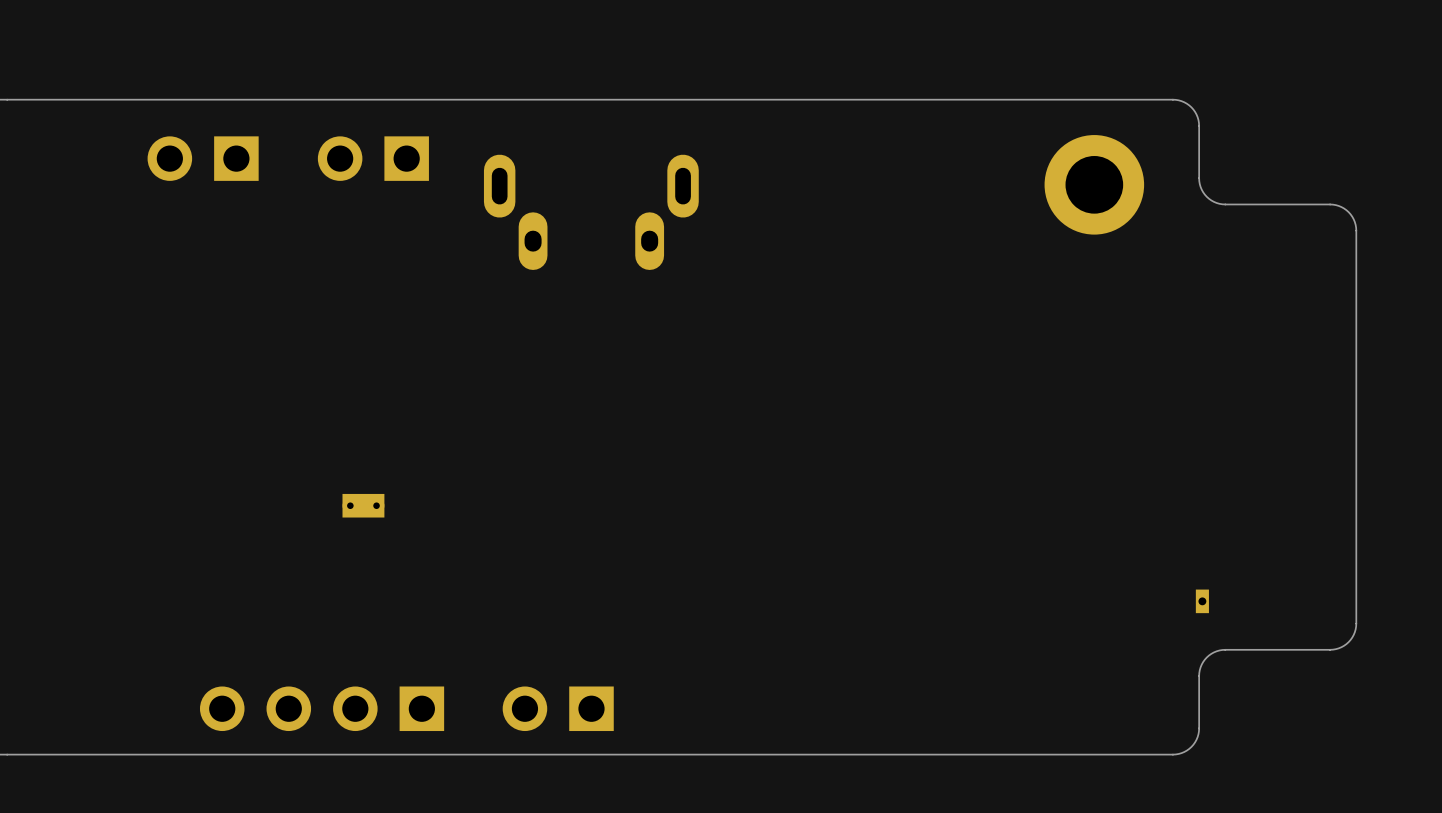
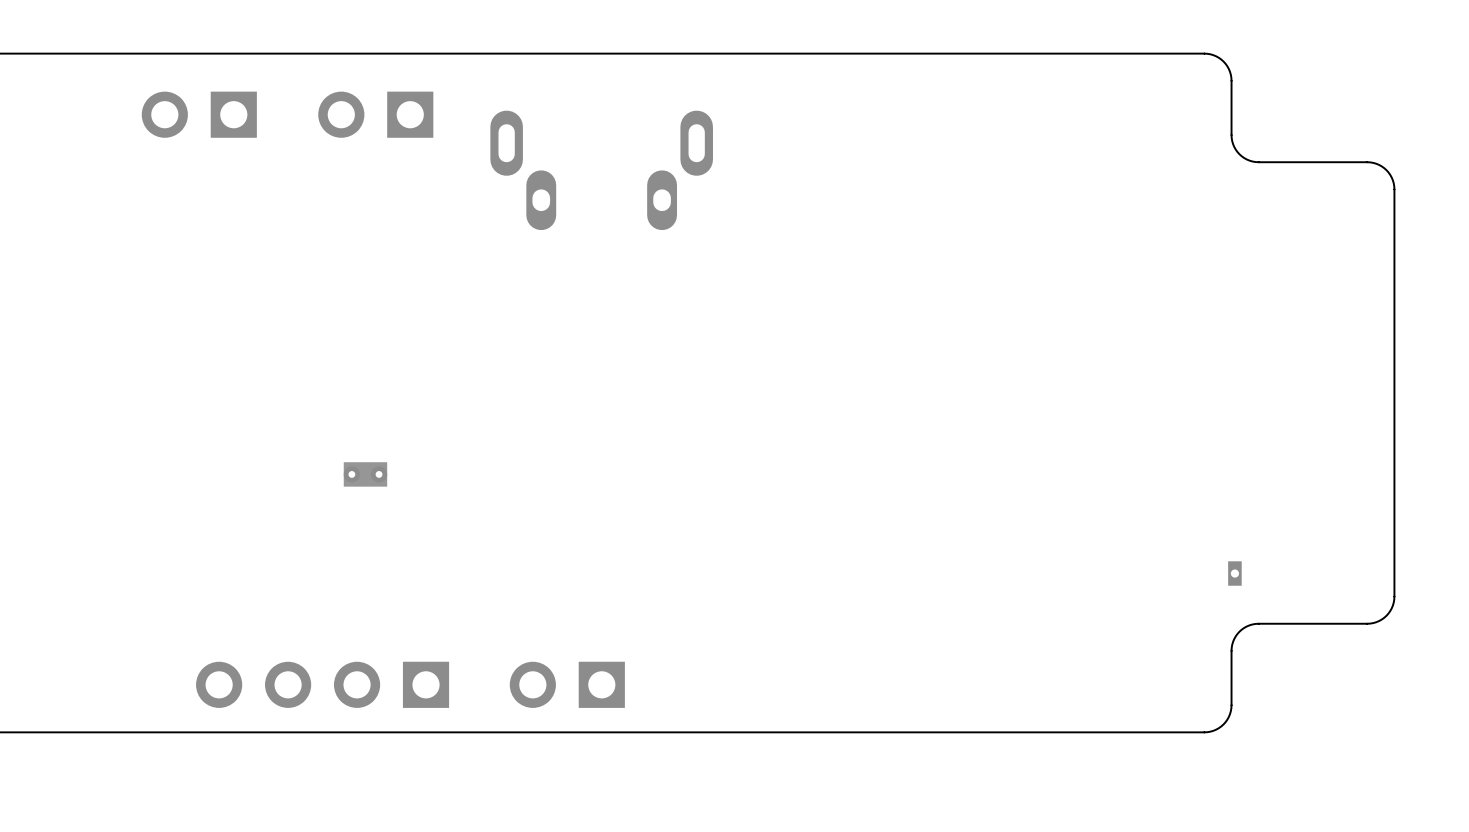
part: (1094, 184) -> none

